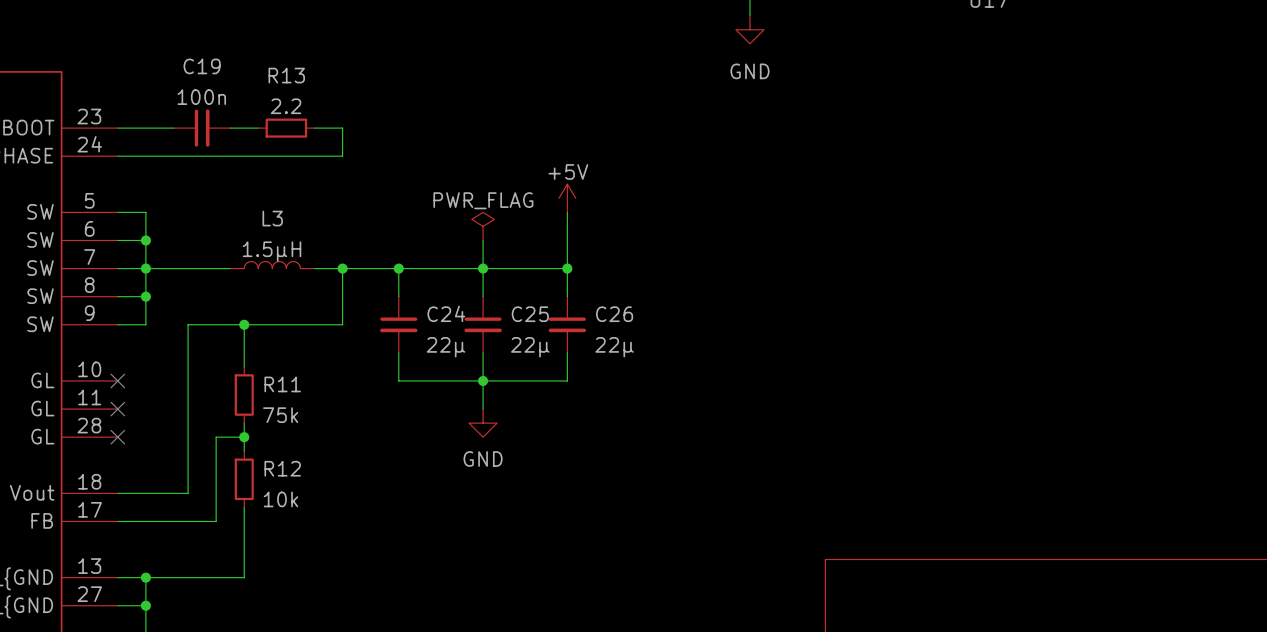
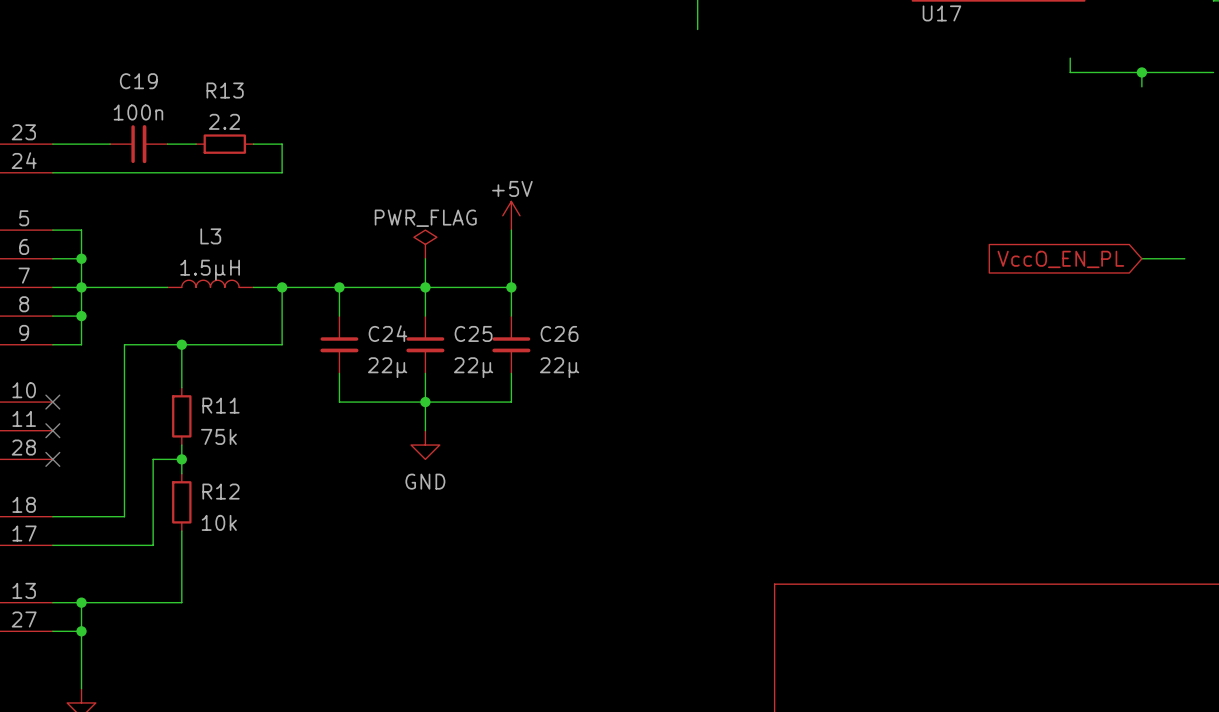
power symbol: GND (749, 29) -> none
wire: none -> (1070, 58) (1070, 72) (1213, 72)
wire: none -> (1141, 72) (1141, 86)
junction: none -> (1141, 72)
wire: none -> (1141, 258) (1184, 258)
global label: none -> VccO_EN_PL (1060, 259)

